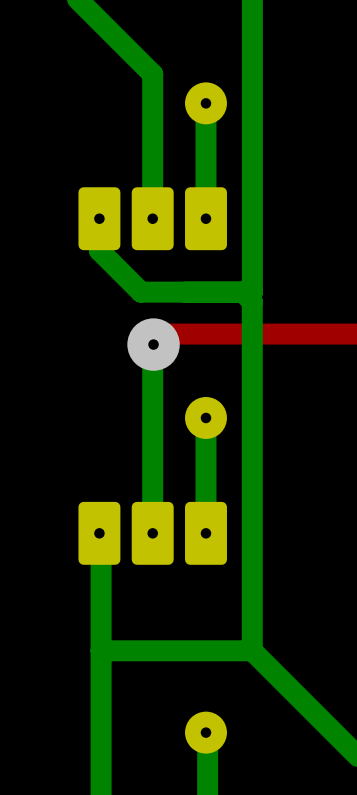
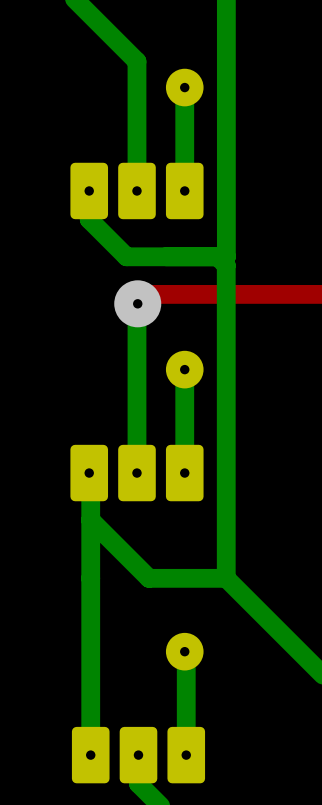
bottom track: (166, 650) (101, 650) -> (149, 578) (90, 520)

